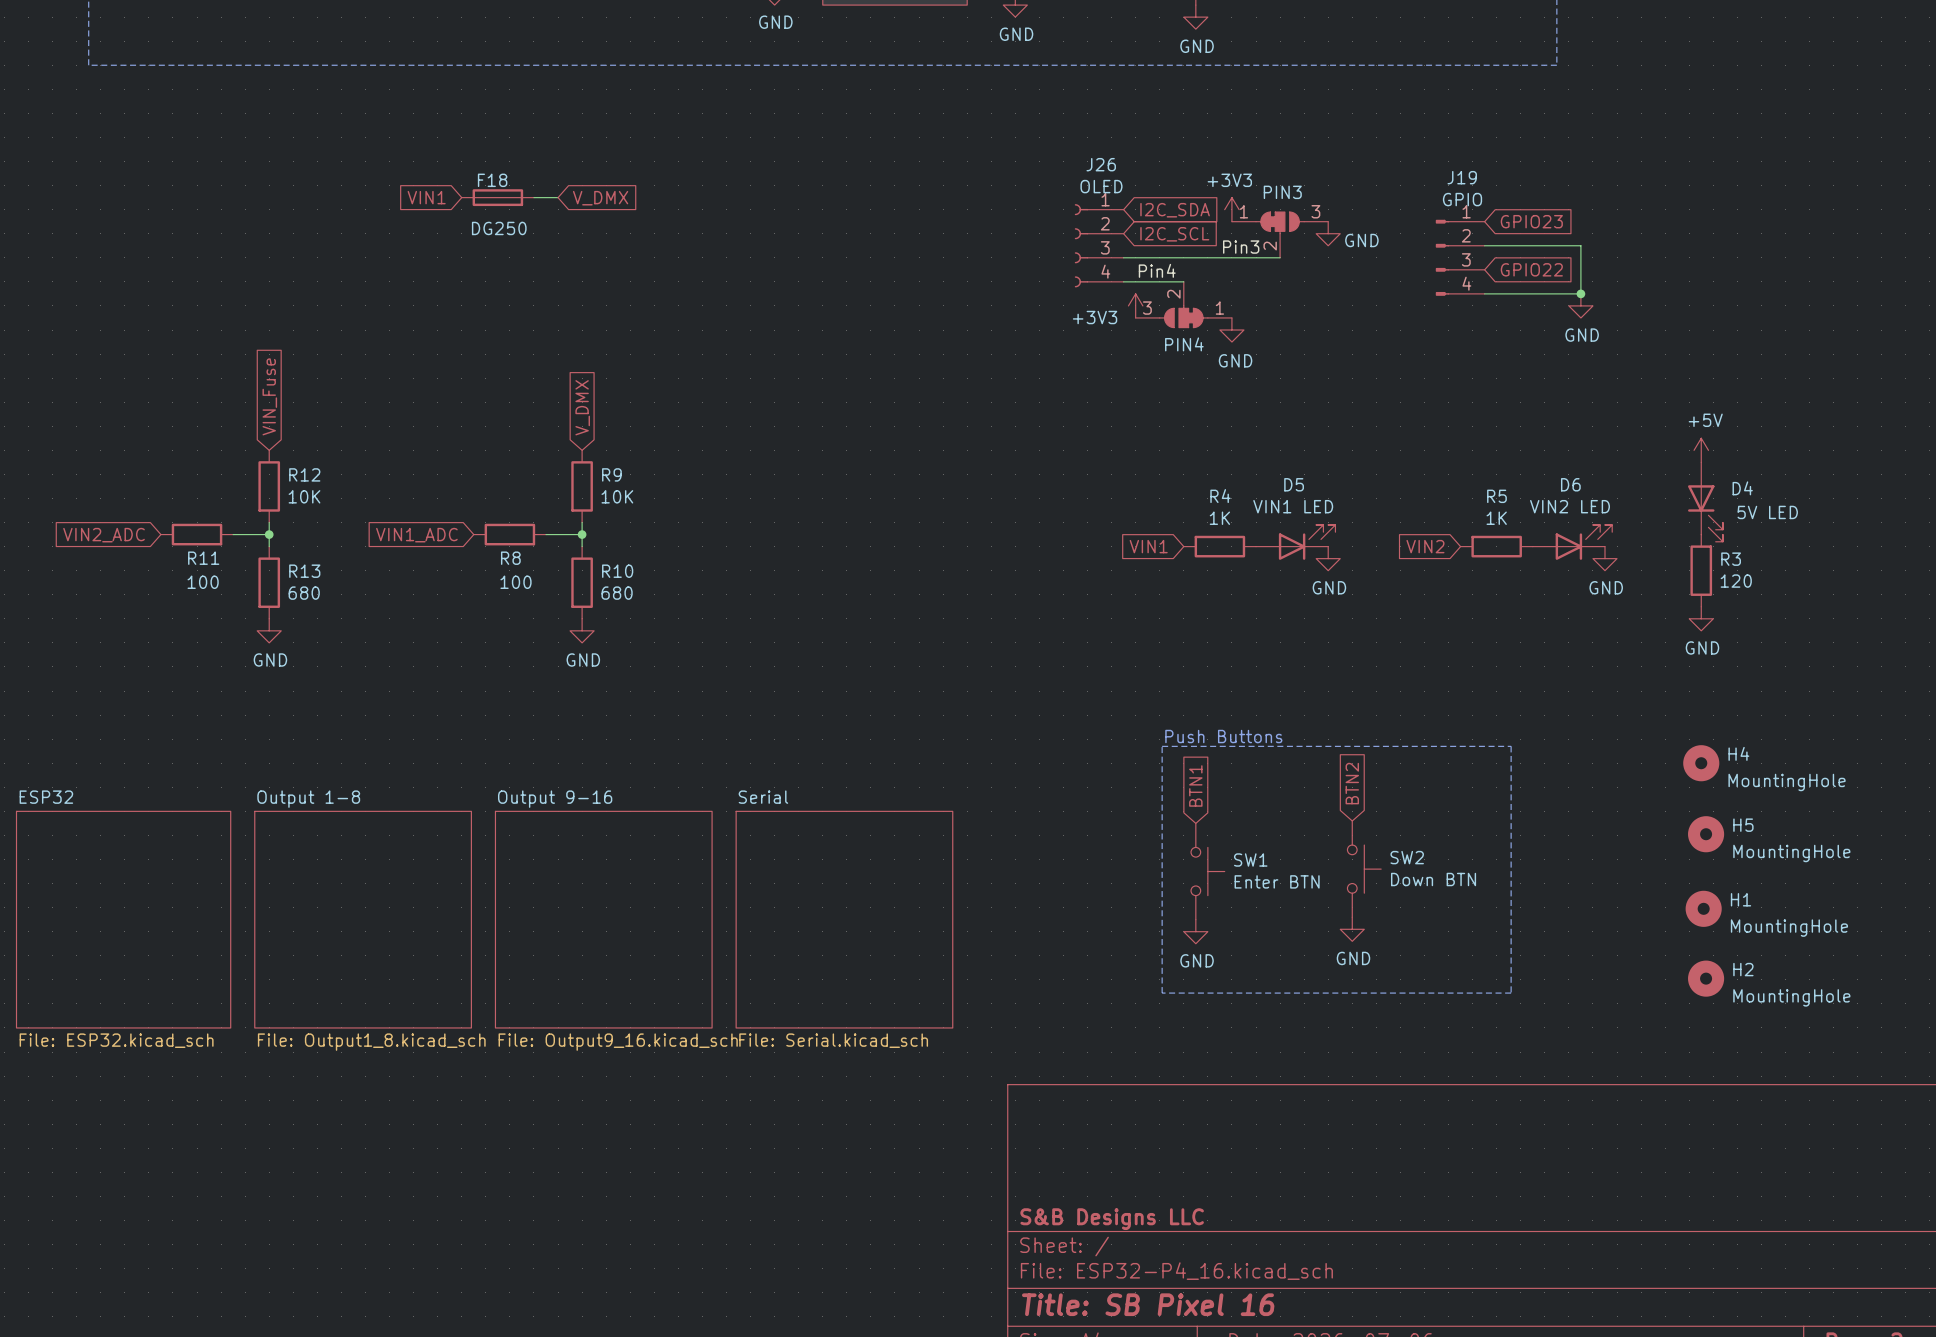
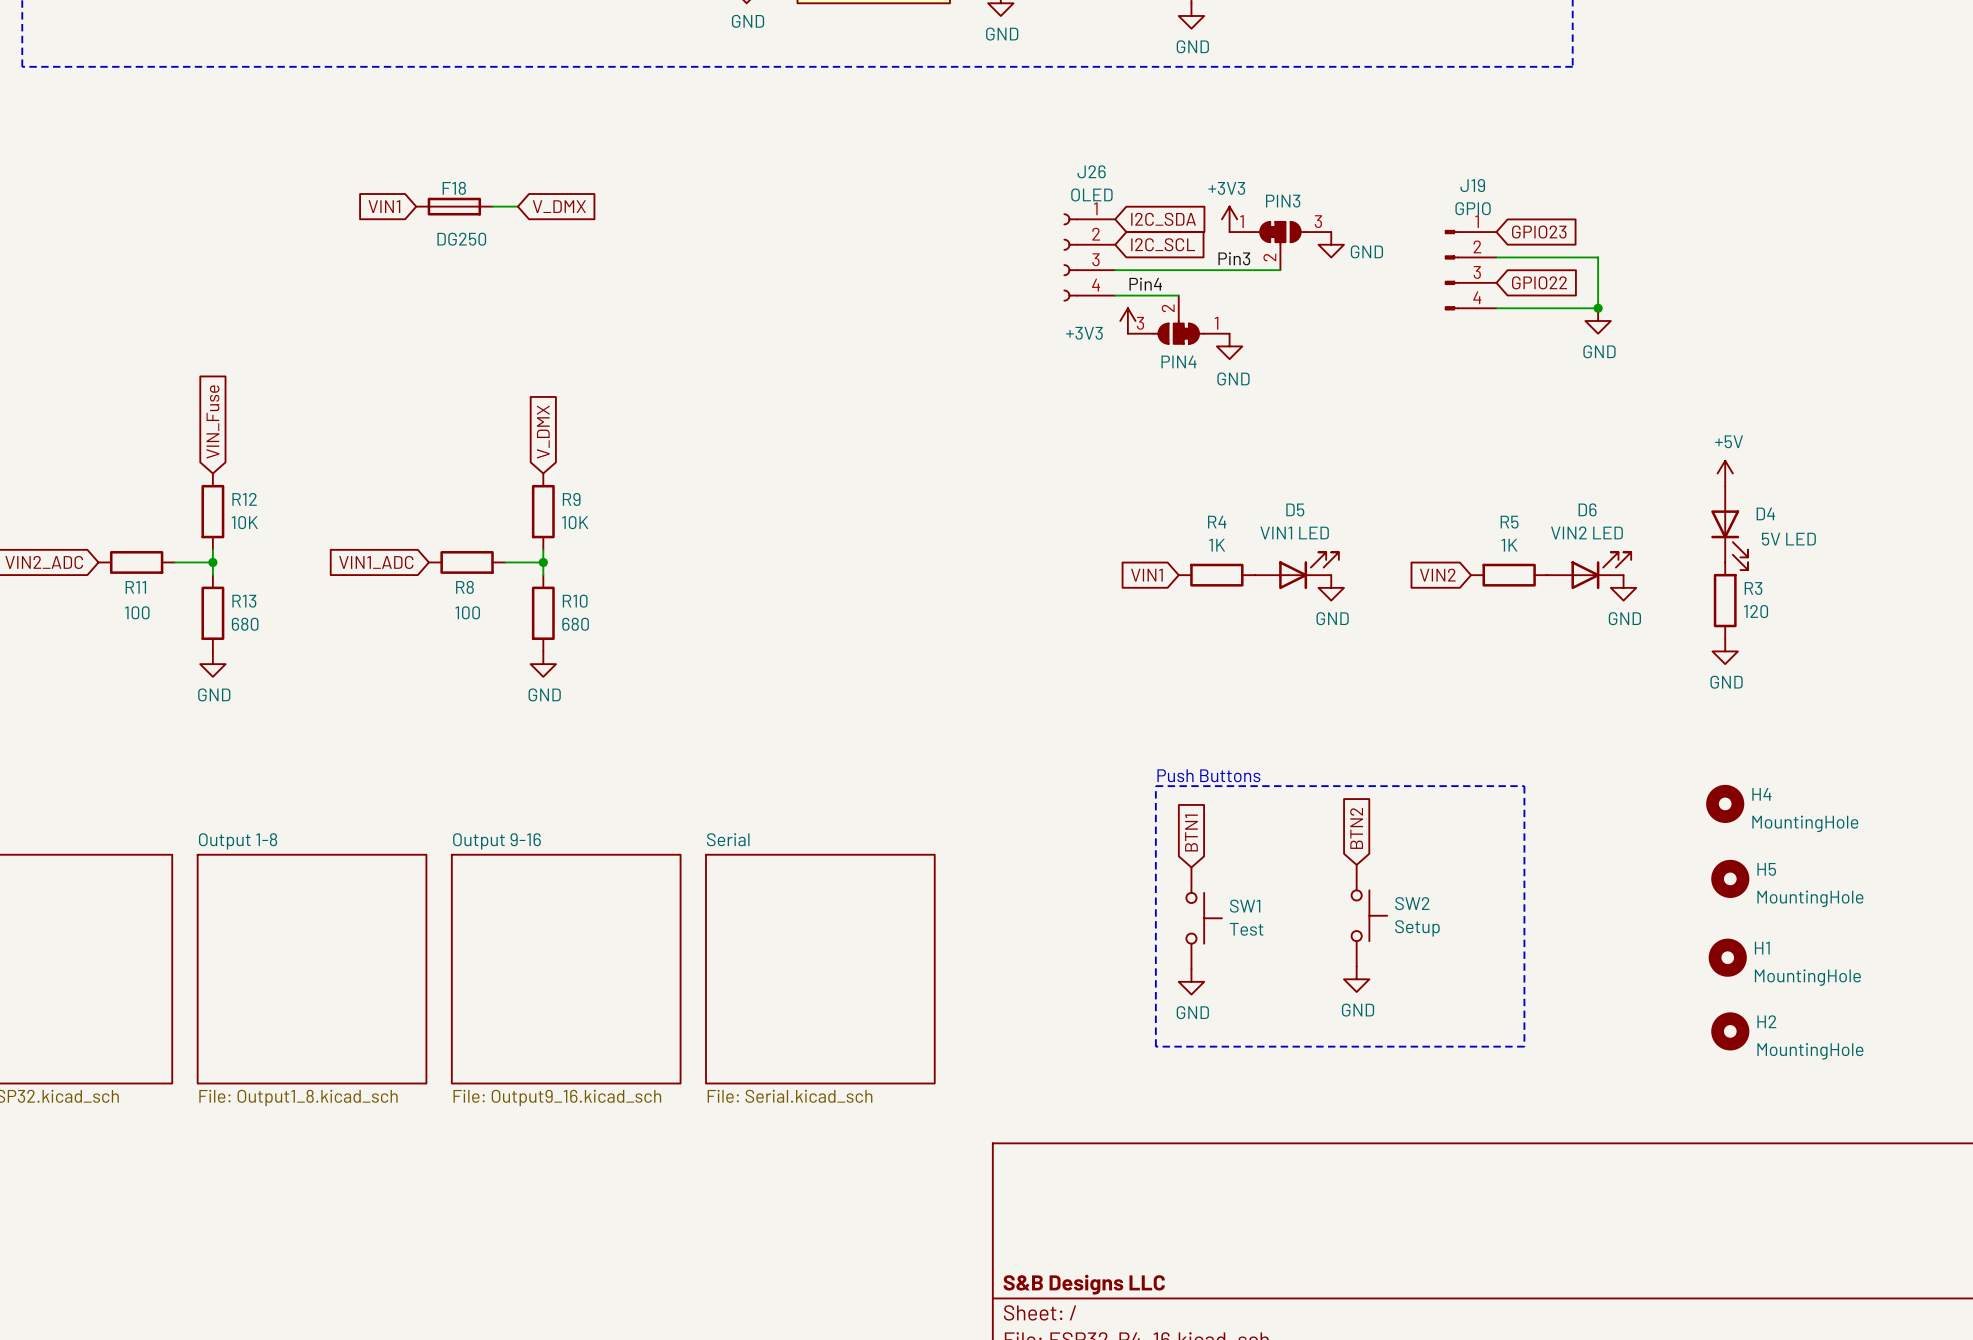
SW2 value: Down BTN (1433, 879) -> Setup (1417, 928)
SW1 value: Enter BTN (1277, 881) -> Test (1246, 929)

